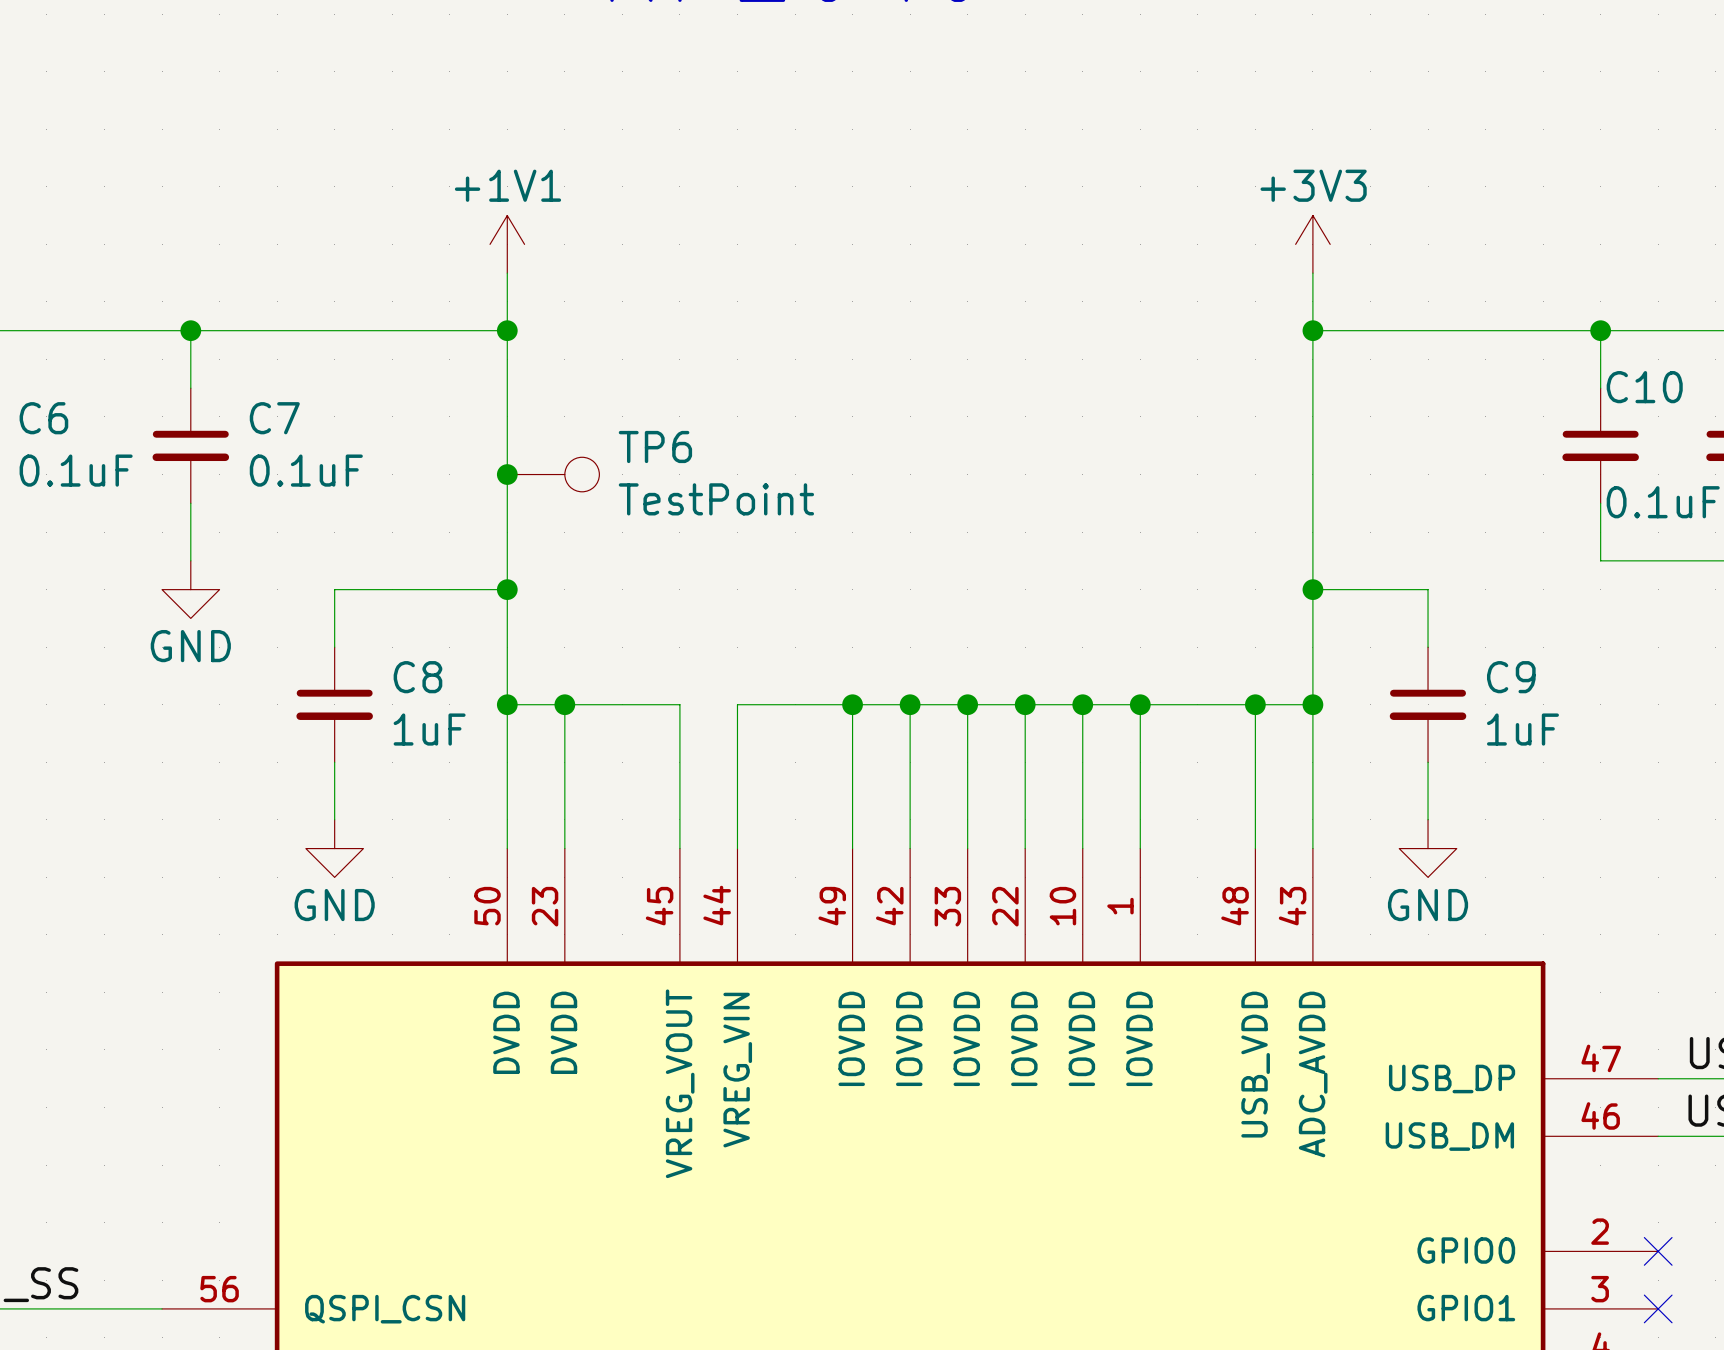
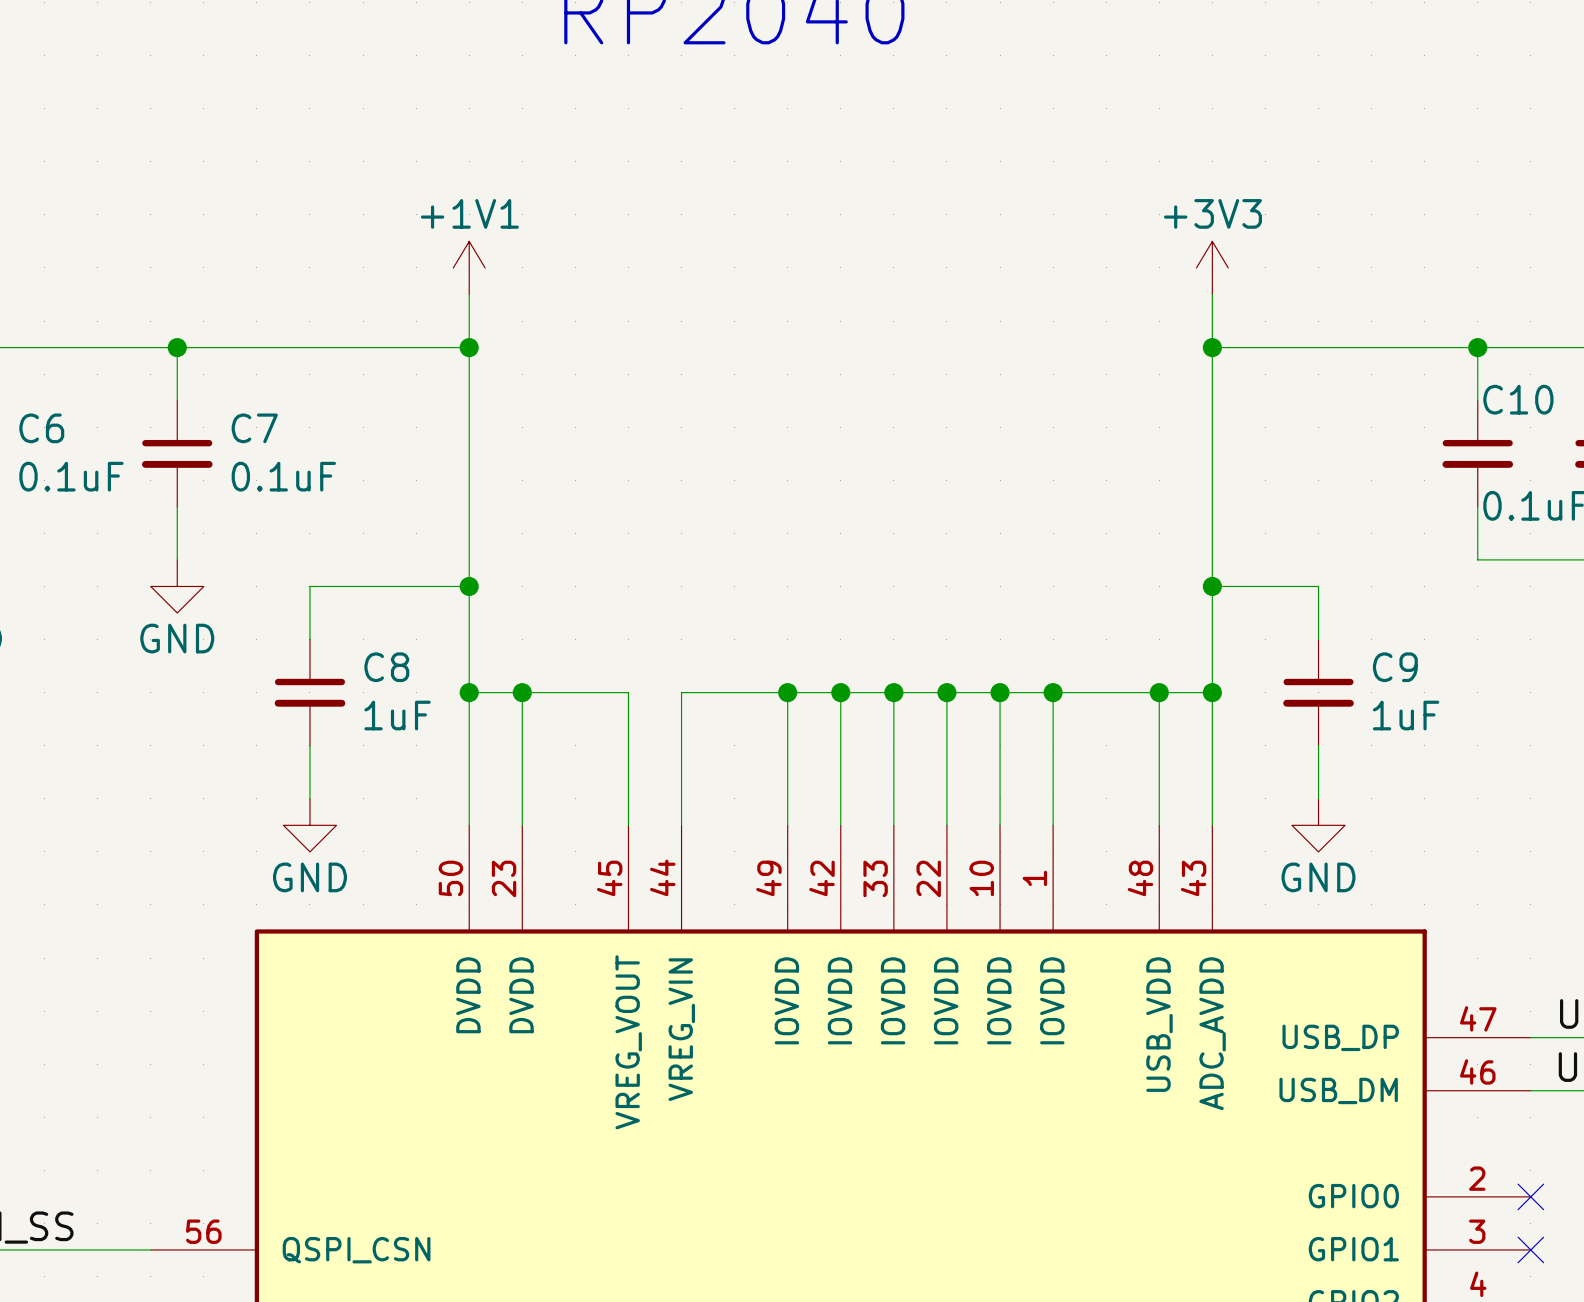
junction: (507, 474) -> none
TP6: TestPoint (553, 474) -> none

